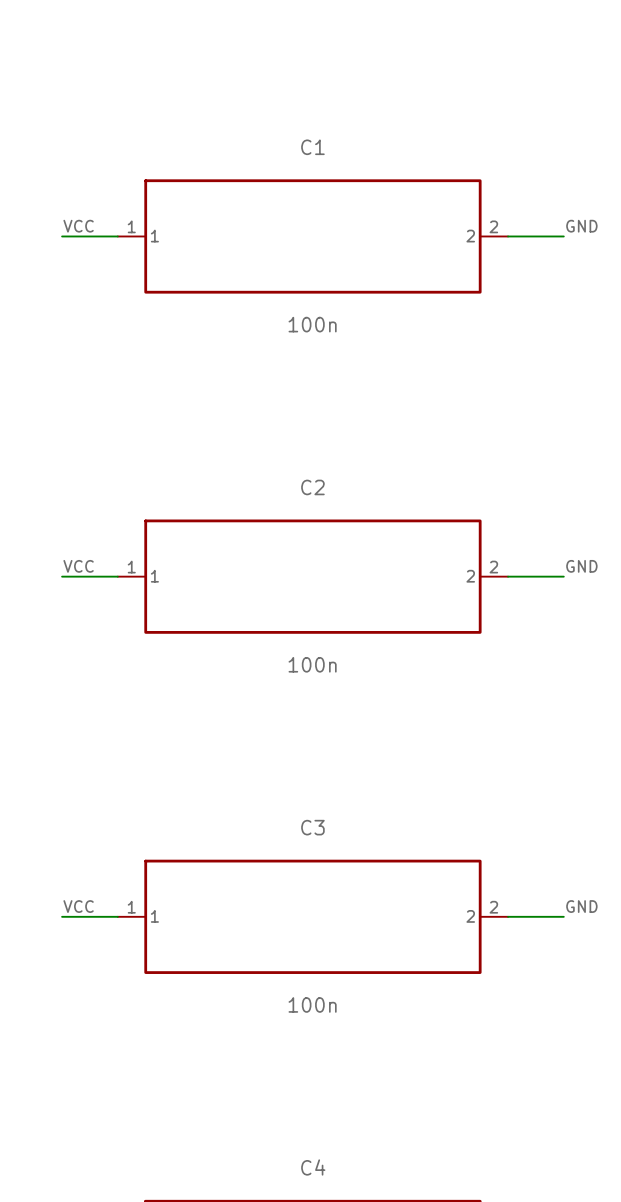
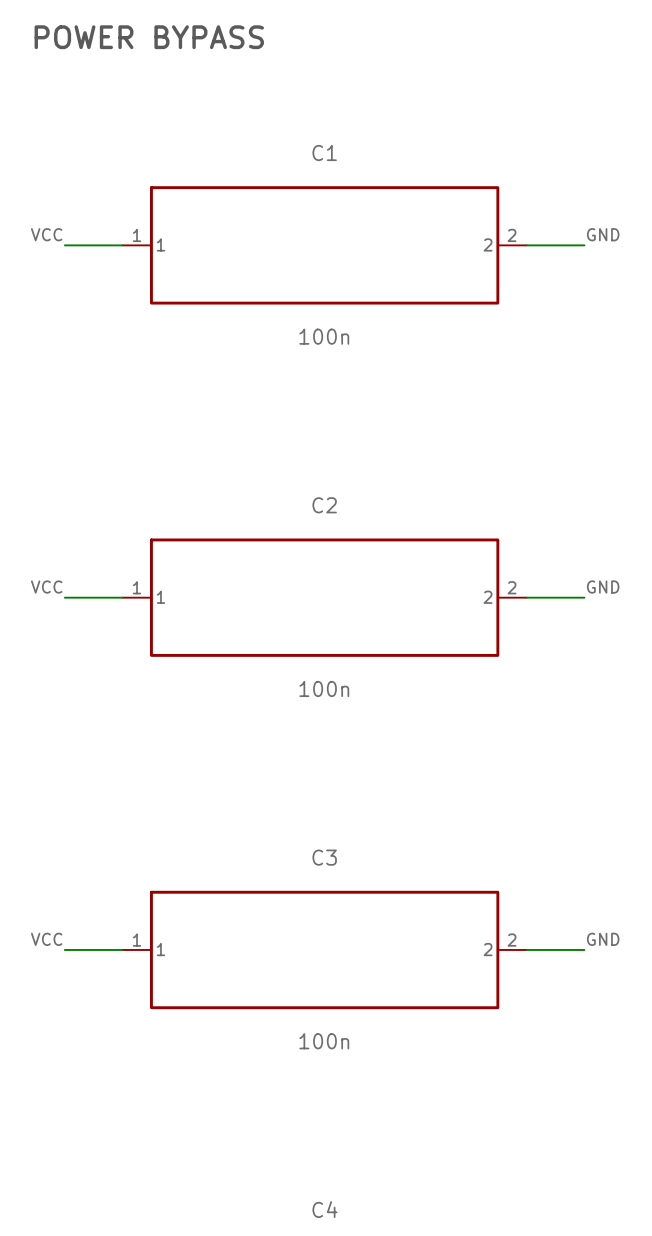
text: none -> POWER BYPASS (149, 37)
label position: VCC (78, 226) -> VCC (46, 234)
label position: VCC (78, 566) -> VCC (46, 587)
label position: VCC (78, 906) -> VCC (46, 939)

